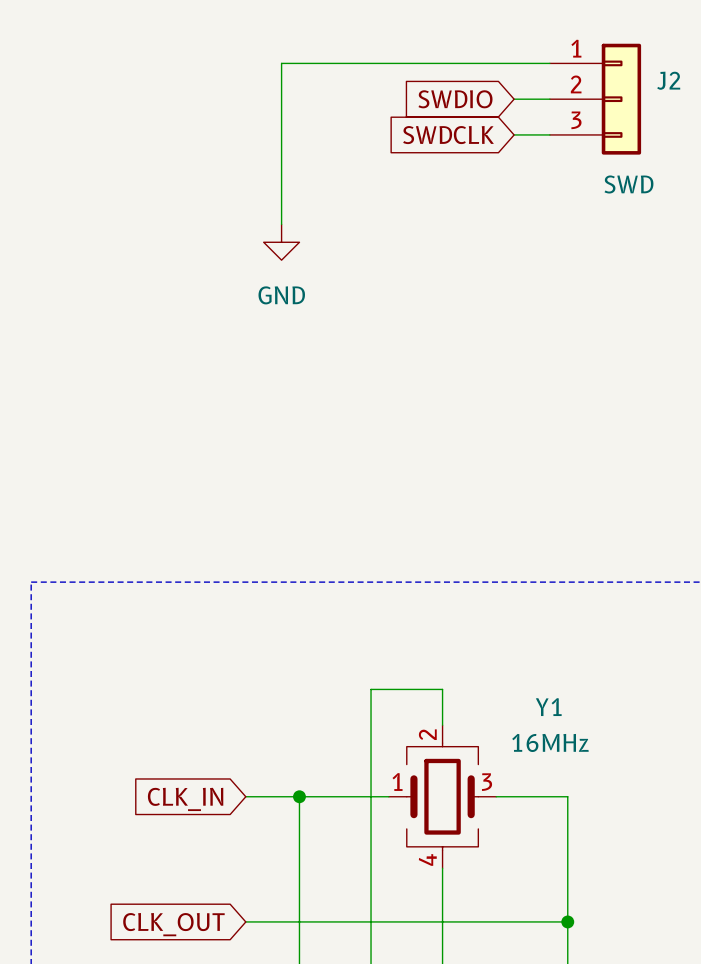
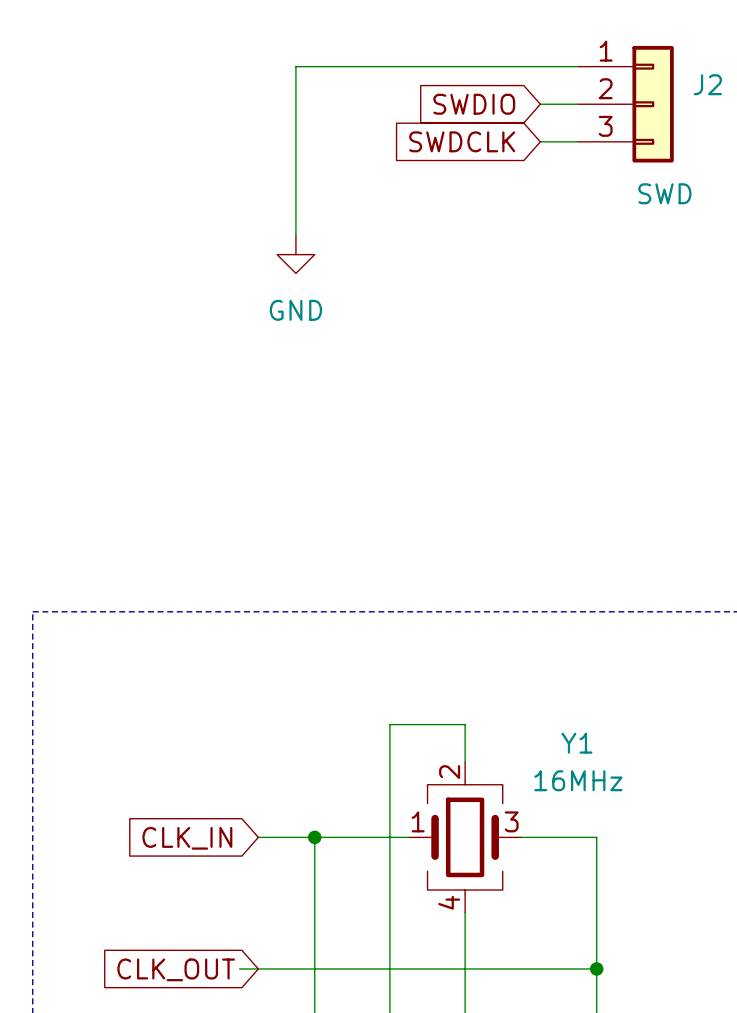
wire: none -> (239, 968) (258, 968)

